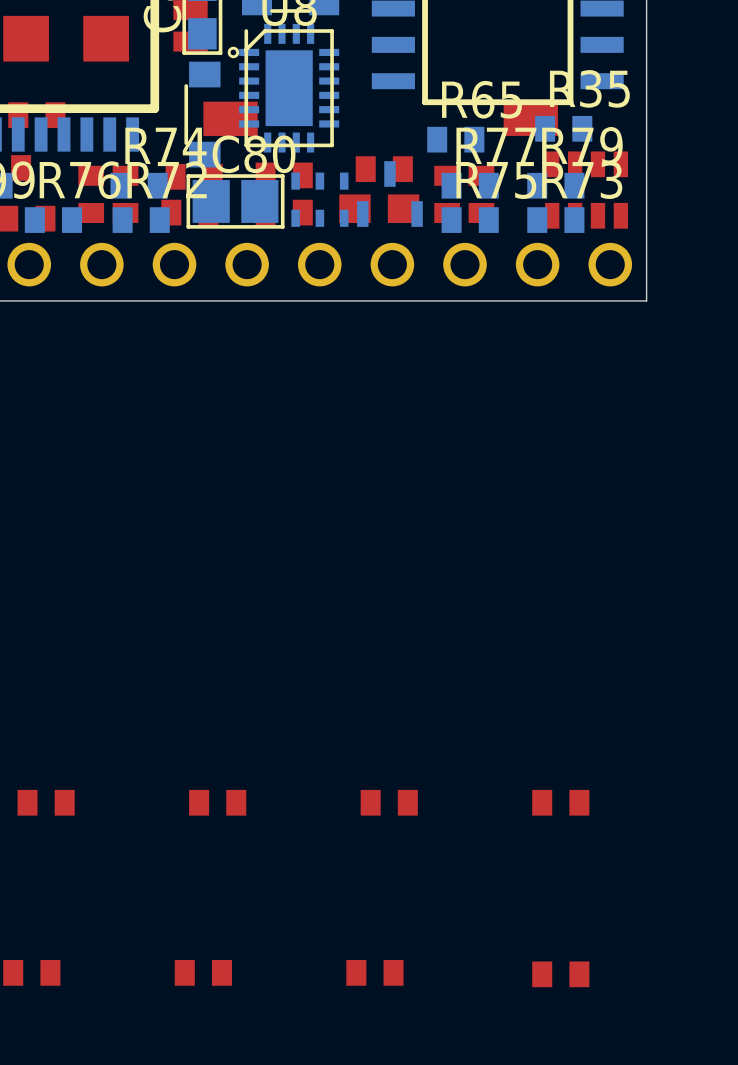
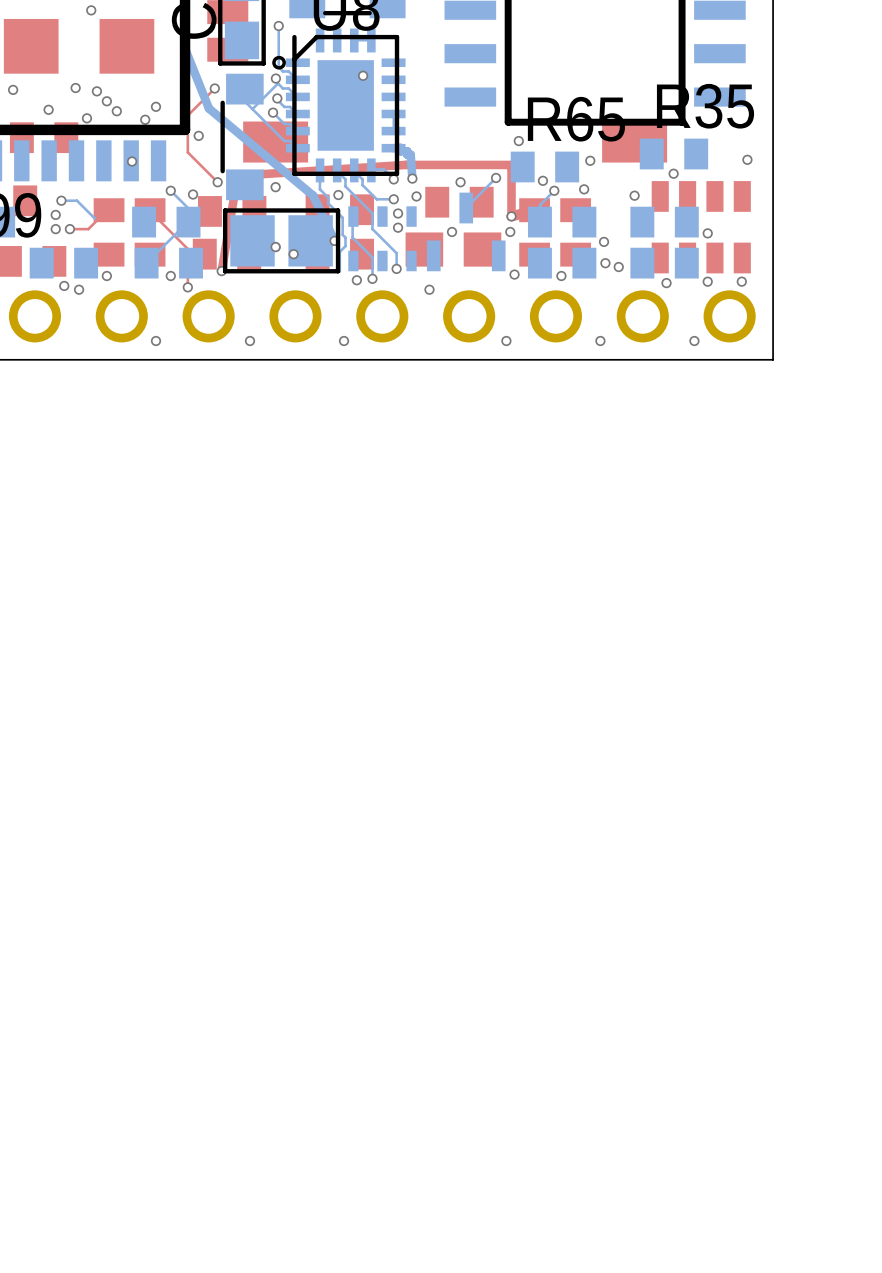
via: none -> (91, 10)
bottom track: none -> (278, 25) (278, 67) (283, 71) (288, 71) (297, 79)
via: none -> (278, 25)
bottom track: none -> (371, 40) (354, 40)
bottom track: none -> (185, 48) (208, 108) (313, 195) (334, 240)
via: none -> (363, 75)
bottom track: none -> (275, 78) (275, 81) (283, 88) (288, 88) (297, 97)
via: none -> (275, 78)
bottom track: none -> (278, 83) (252, 109)
via: none -> (75, 88)
top track: none -> (214, 88) (187, 115) (187, 152) (217, 182)
via: none -> (214, 88)
bottom track: none -> (244, 89) (244, 101) (284, 141) (290, 141) (297, 148)
via: none -> (13, 89)
via: none -> (96, 91)
bottom track: none -> (277, 98) (284, 106) (290, 106) (297, 114)
via: none -> (277, 98)
via: none -> (106, 101)
via: none -> (155, 106)
via: none -> (48, 109)
via: none -> (116, 111)
bottom track: none -> (273, 112) (284, 124) (290, 124) (297, 131)
via: none -> (273, 112)
bottom track: none -> (393, 114) (393, 131)
via: none -> (86, 118)
via: none -> (145, 119)
via: none -> (198, 135)
via: none -> (518, 141)
bottom track: none -> (393, 148) (400, 147) (400, 151) (407, 151) (407, 154) (410, 154) (412, 178)
via: none -> (747, 159)
via: none -> (590, 160)
via: none -> (132, 161)
bottom track: none -> (319, 170) (319, 189) (328, 197) (328, 203) (342, 217) (342, 234) (345, 237) (345, 246) (339, 251) (339, 271)
bottom track: none -> (336, 170) (345, 179) (345, 186) (372, 213) (372, 229) (396, 253) (396, 268)
bottom track: none -> (354, 170) (362, 179) (362, 185) (376, 199) (393, 199)
bottom track: none -> (371, 170) (383, 169) (393, 179)
R74 name: R74 (165, 145) -> none
R77 name: R77 (496, 145) -> none
via: none -> (673, 173)
R79 name: R79 (582, 145) -> none
bottom track: none -> (496, 177) (466, 207)
via: none -> (496, 177)
via: none -> (412, 178)
via: none -> (393, 179)
via: none -> (542, 180)
via: none -> (217, 182)
via: none -> (460, 182)
C80 name: C80 (254, 154) -> none
via: none -> (275, 187)
via: none -> (584, 189)
bottom track: none -> (170, 190) (189, 209) (189, 222) (146, 263)
via: none -> (170, 190)
bottom track: none -> (554, 190) (540, 204) (540, 222)
via: none -> (554, 190)
via: none -> (193, 194)
via: none -> (338, 195)
via: none -> (634, 195)
via: none -> (416, 196)
via: none -> (393, 199)
bottom track: none -> (61, 200) (77, 200) (94, 218)
via: none -> (61, 200)
top track: none -> (109, 210) (88, 229) (69, 229)
top track: none -> (150, 210) (187, 249) (187, 287)
top track: none -> (534, 210) (511, 216) (511, 164) (405, 164) (246, 175) (236, 183) (221, 271)
via: none -> (398, 213)
via: none -> (55, 214)
R72 name: R72 (167, 179) -> none
R76 name: R76 (80, 180) -> none
via: none -> (511, 216)
R75 name: R75 (496, 180) -> none
R73 name: R73 (582, 180) -> none
bottom track: none -> (353, 216) (352, 237) (372, 257) (372, 278)
via: none -> (398, 227)
via: none -> (55, 229)
via: none -> (69, 229)
via: none -> (452, 231)
via: none -> (510, 231)
via: none -> (707, 233)
via: none -> (334, 240)
via: none -> (604, 241)
via: none -> (275, 247)
via: none -> (293, 254)
via: none -> (605, 263)
via: none -> (618, 267)
via: none -> (396, 268)
via: none -> (221, 271)
via: none -> (514, 274)
via: none -> (106, 275)
via: none -> (170, 275)
via: none -> (561, 275)
via: none -> (372, 278)
via: none -> (356, 280)
via: none -> (707, 281)
via: none -> (741, 281)
via: none -> (666, 283)
via: none -> (64, 285)
via: none -> (187, 287)
via: none -> (79, 289)
via: none -> (429, 289)
via: none -> (155, 341)
via: none -> (250, 341)
via: none -> (344, 341)
via: none -> (506, 341)
via: none -> (600, 341)
via: none -> (694, 341)
part: (46, 802) -> none
part: (217, 802) -> none
part: (389, 802) -> none
part: (560, 802) -> none
part: (31, 972) -> none
part: (203, 972) -> none
part: (374, 972) -> none
part: (560, 974) -> none

